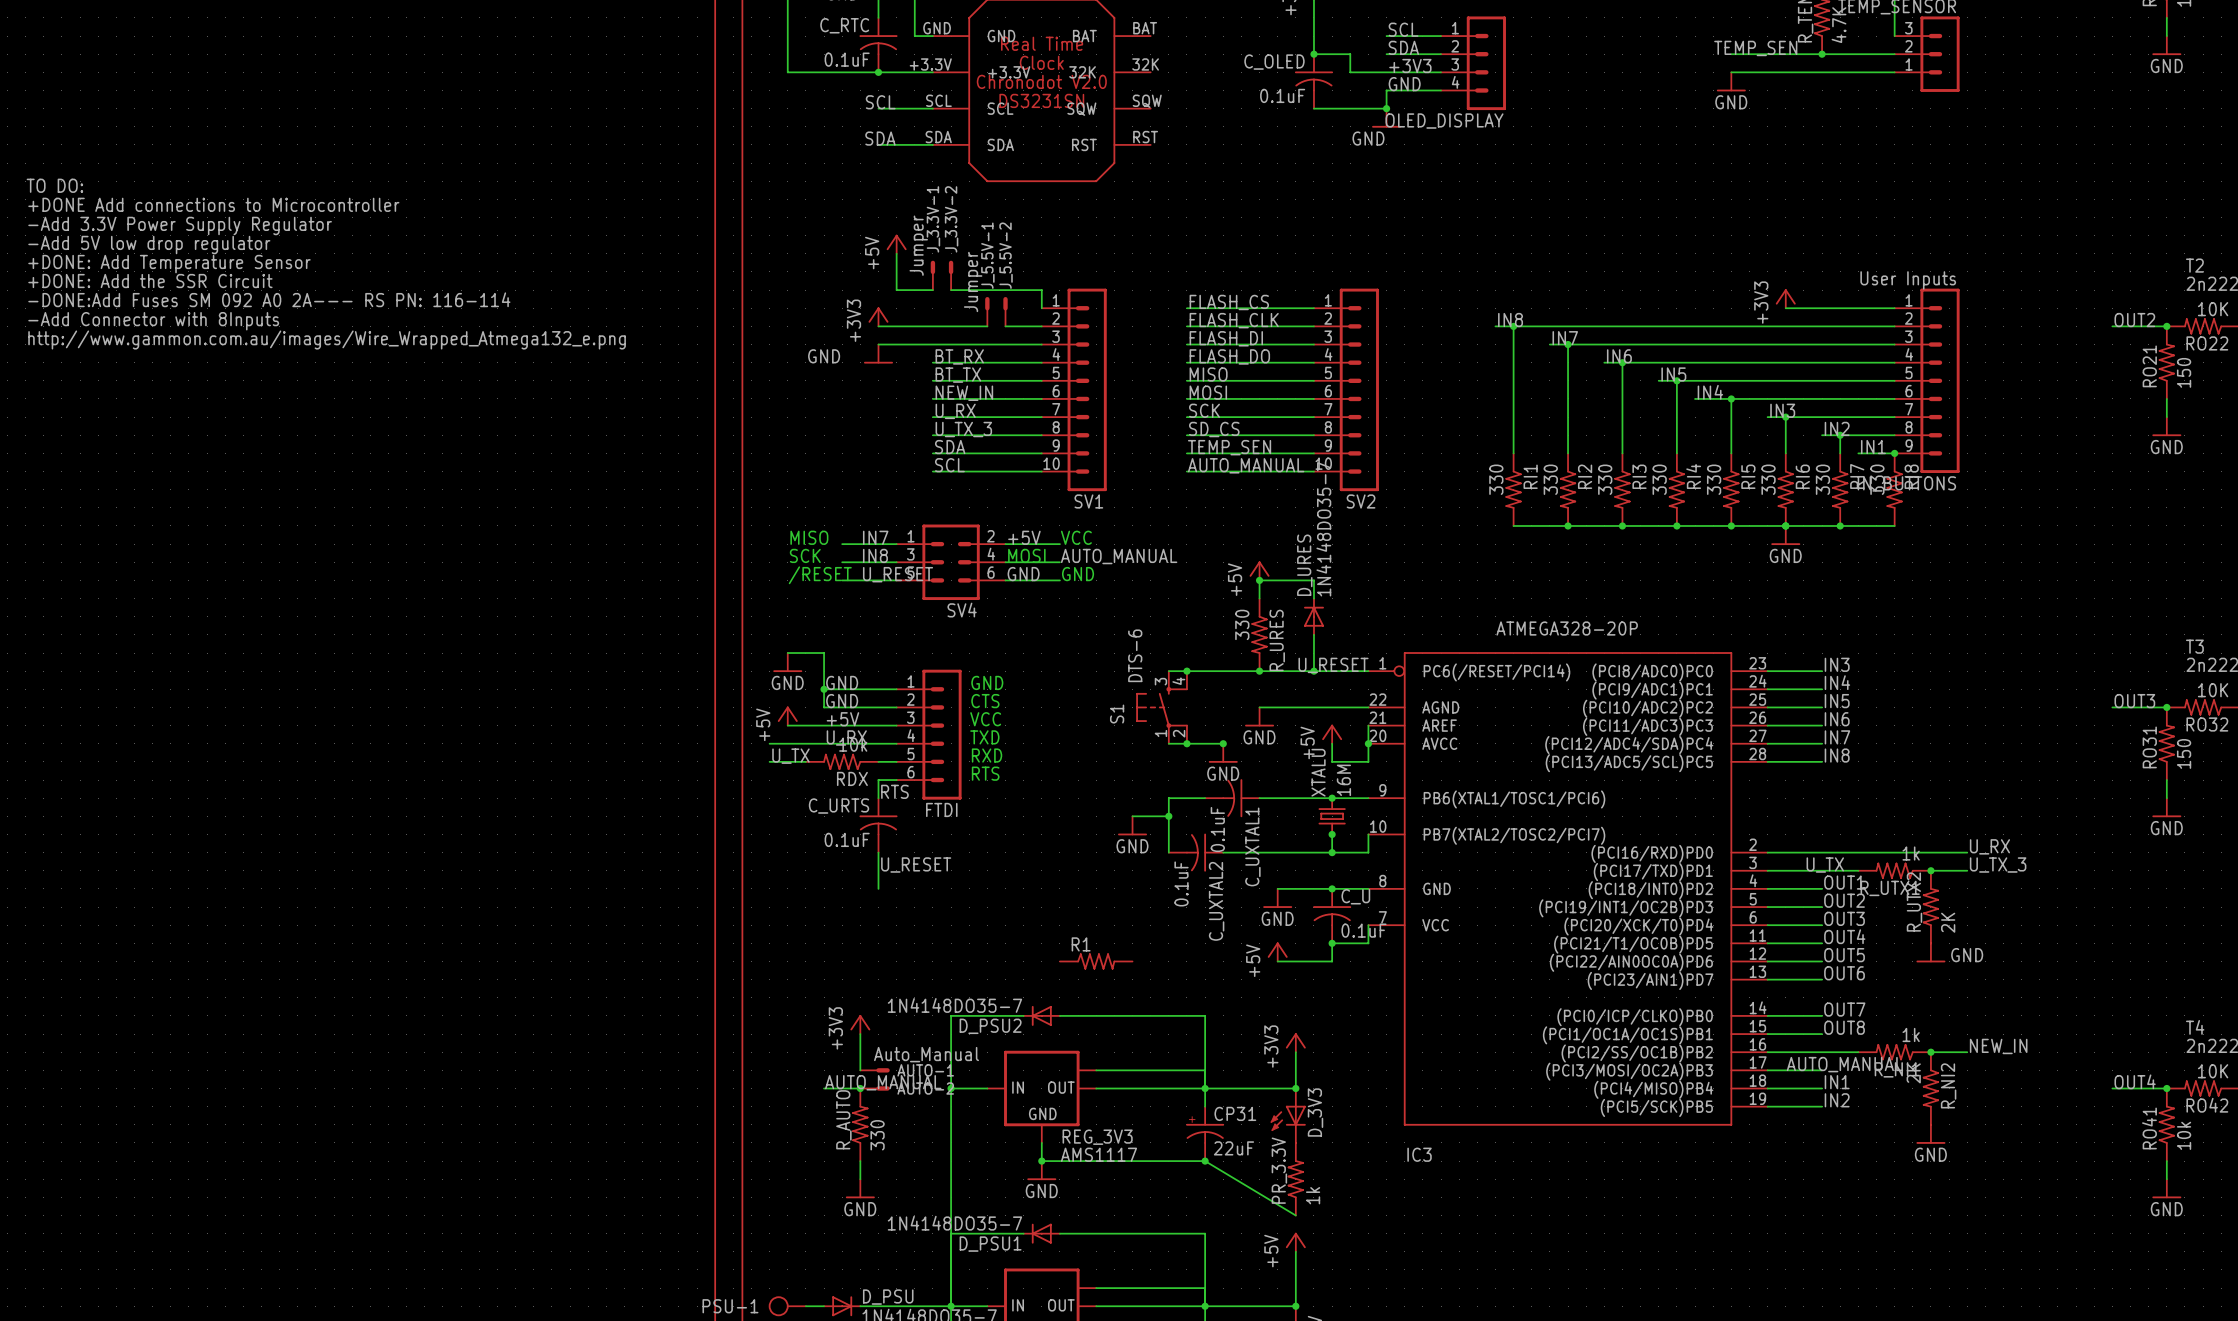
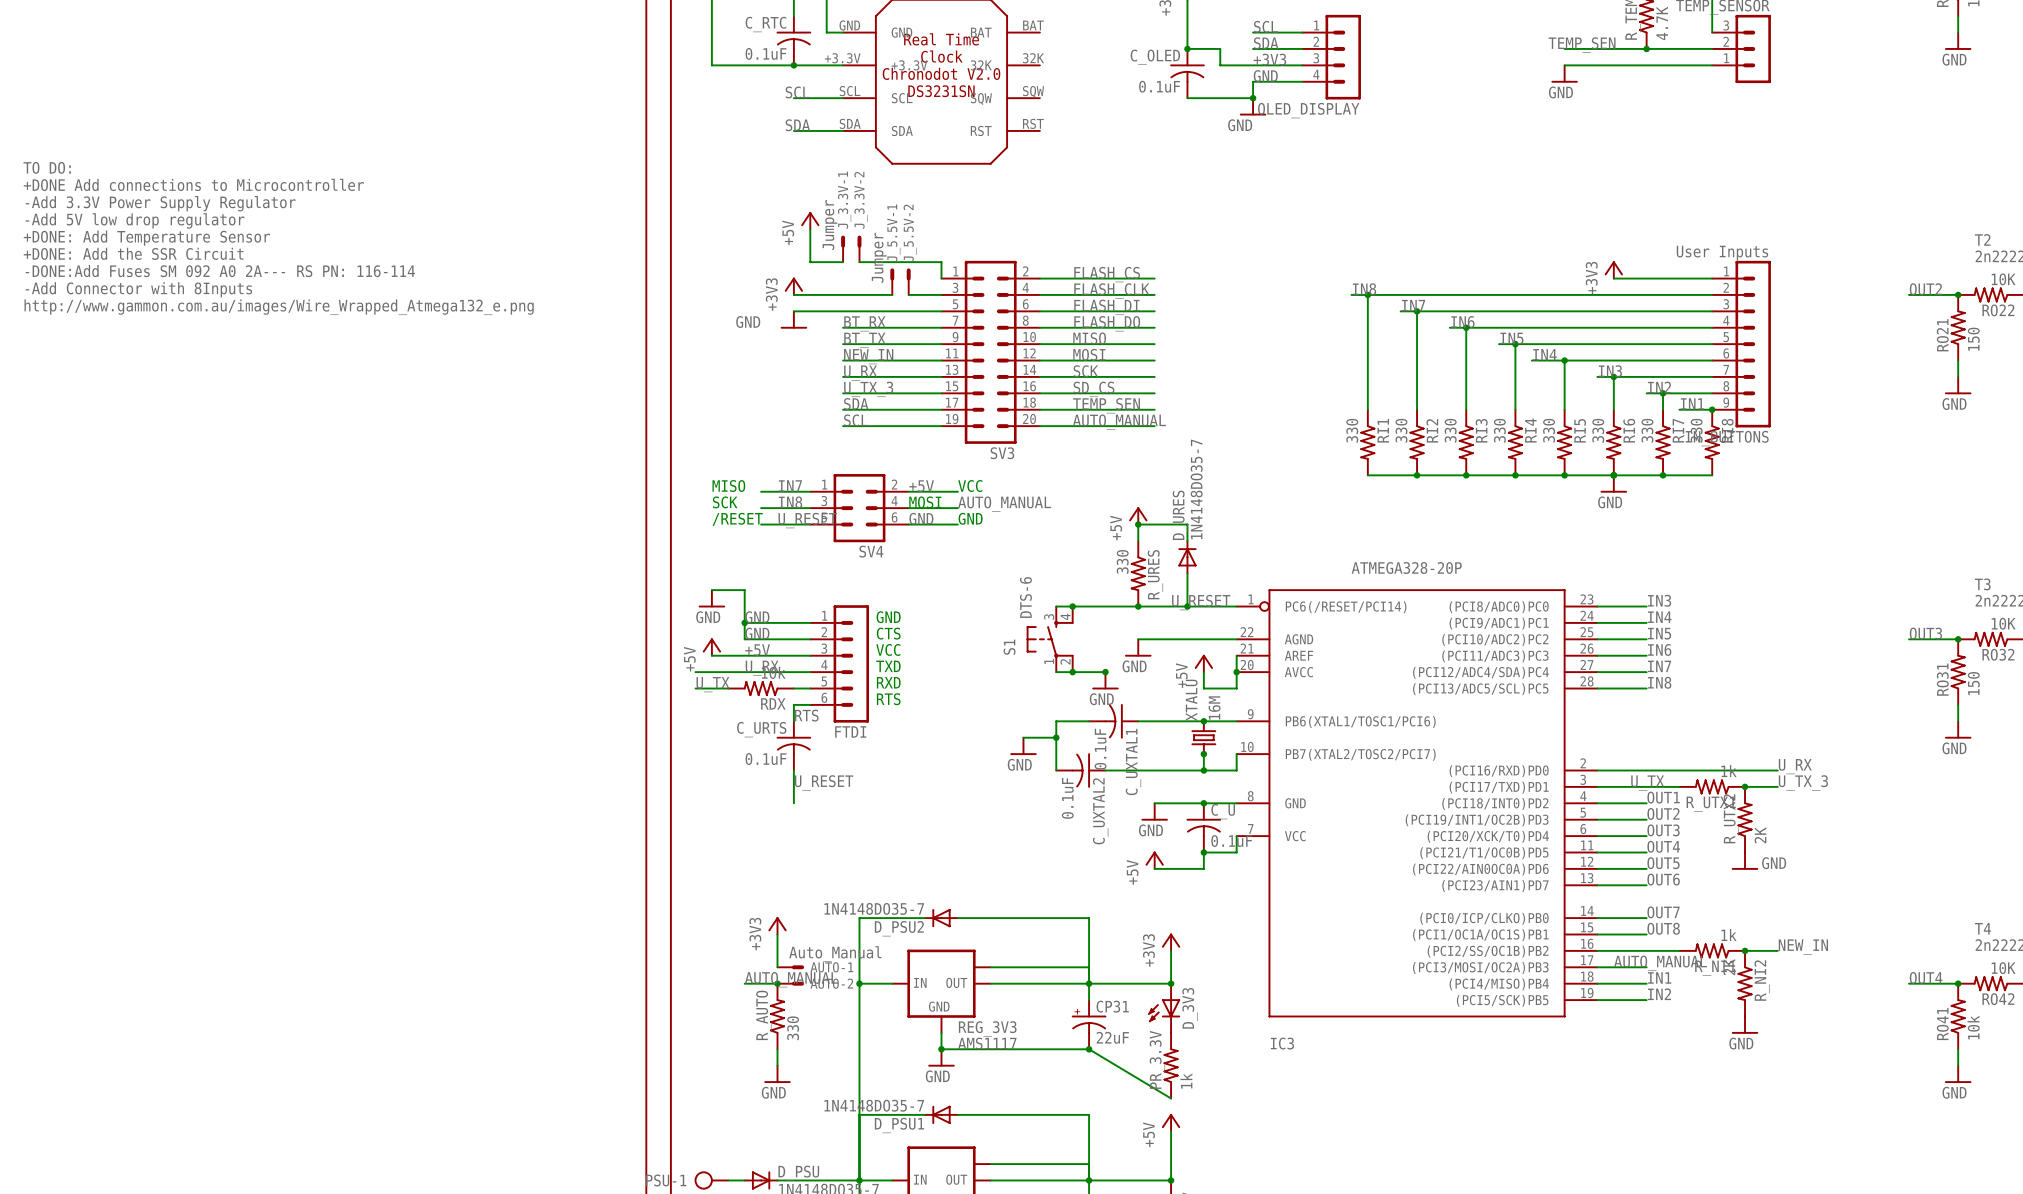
wire: (1277, 308) (1313, 308) -> (1039, 278) (1072, 278)
wire: (1277, 326) (1313, 326) -> (1039, 294) (1072, 294)
wire: (1277, 344) (1313, 344) -> (1039, 311) (1072, 311)
wire: (1277, 362) (1313, 362) -> (1039, 327) (1072, 327)
wire: (1277, 380) (1313, 380) -> (1039, 344) (1072, 344)
SV1: (1074, 389) -> none
SV3: none -> (990, 352)
SV2: (1346, 389) -> none
wire: (1277, 398) (1313, 398) -> (1039, 360) (1072, 360)
wire: (1277, 417) (1313, 417) -> (1039, 376) (1072, 376)
wire: (1277, 435) (1313, 435) -> (1039, 393) (1072, 393)
wire: (1277, 453) (1313, 453) -> (1039, 409) (1072, 409)
wire: (1277, 471) (1313, 471) -> (1039, 426) (1072, 426)
R1: (1096, 961) -> none

